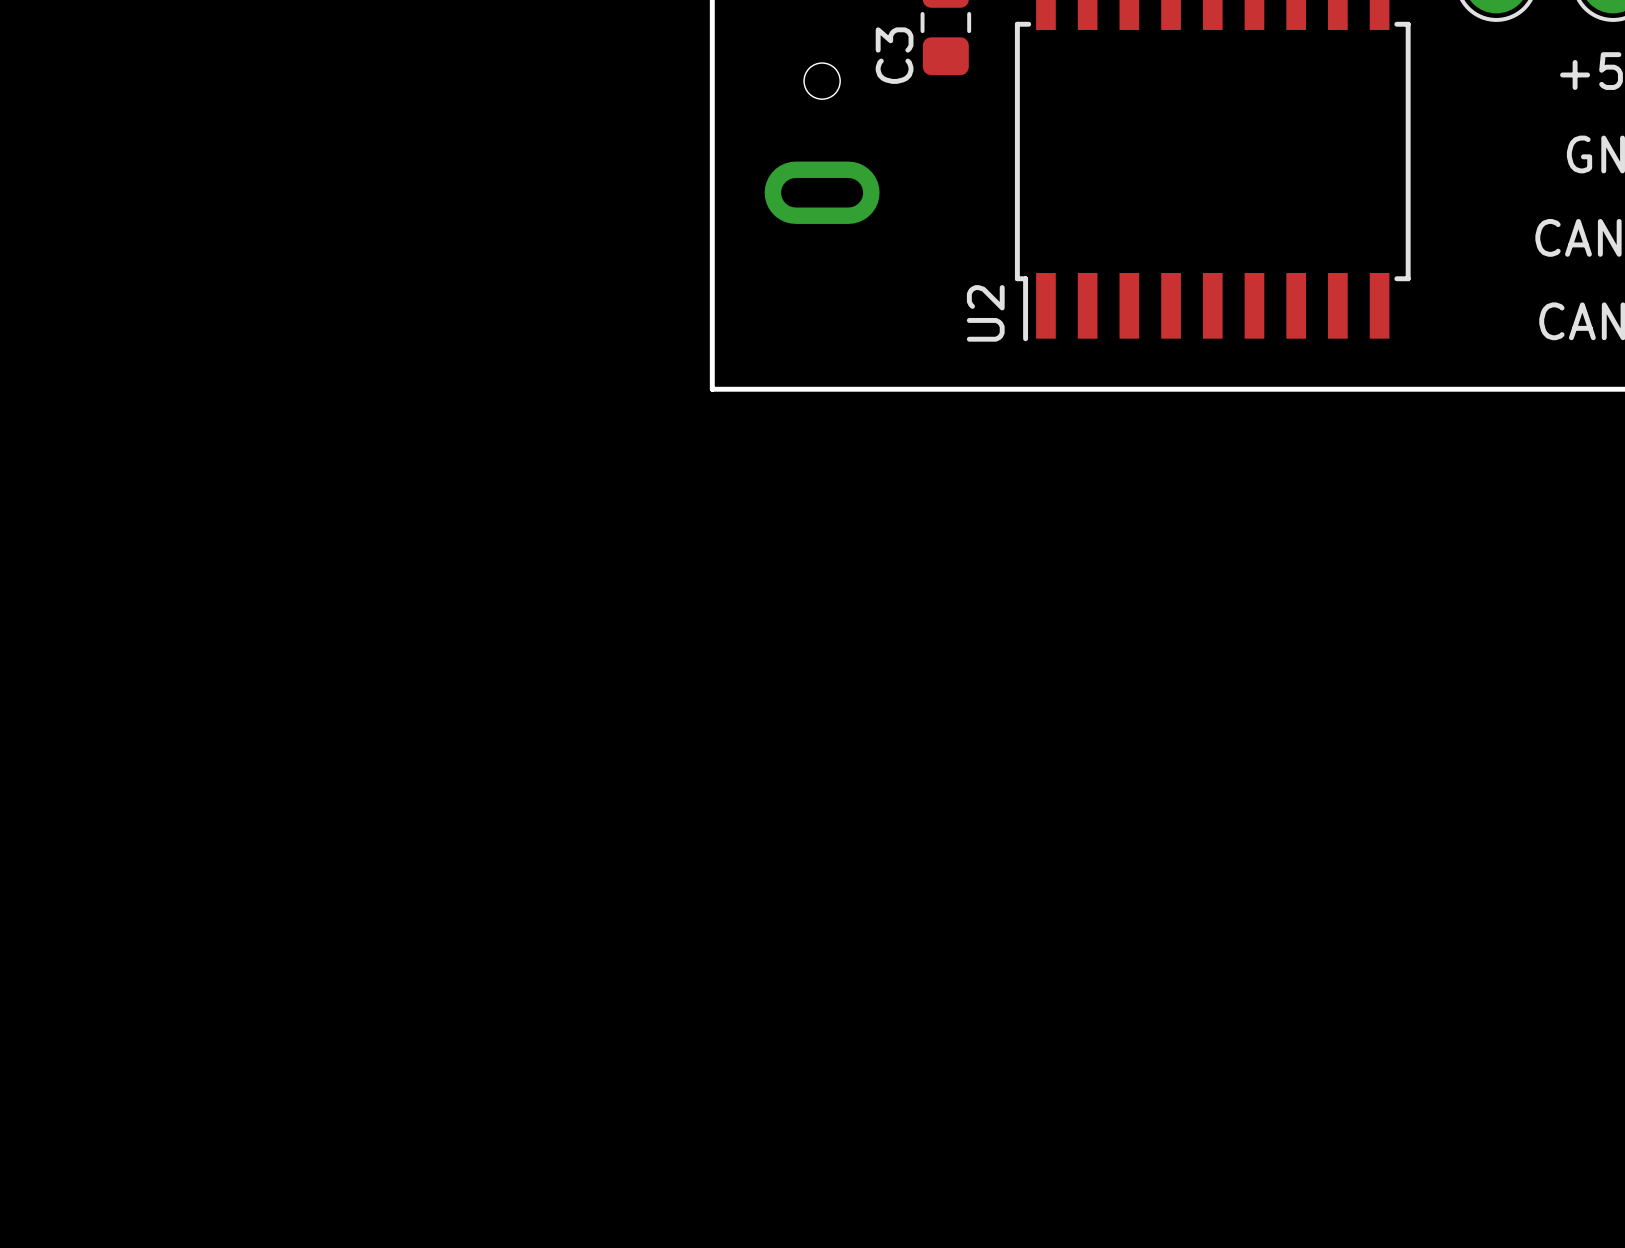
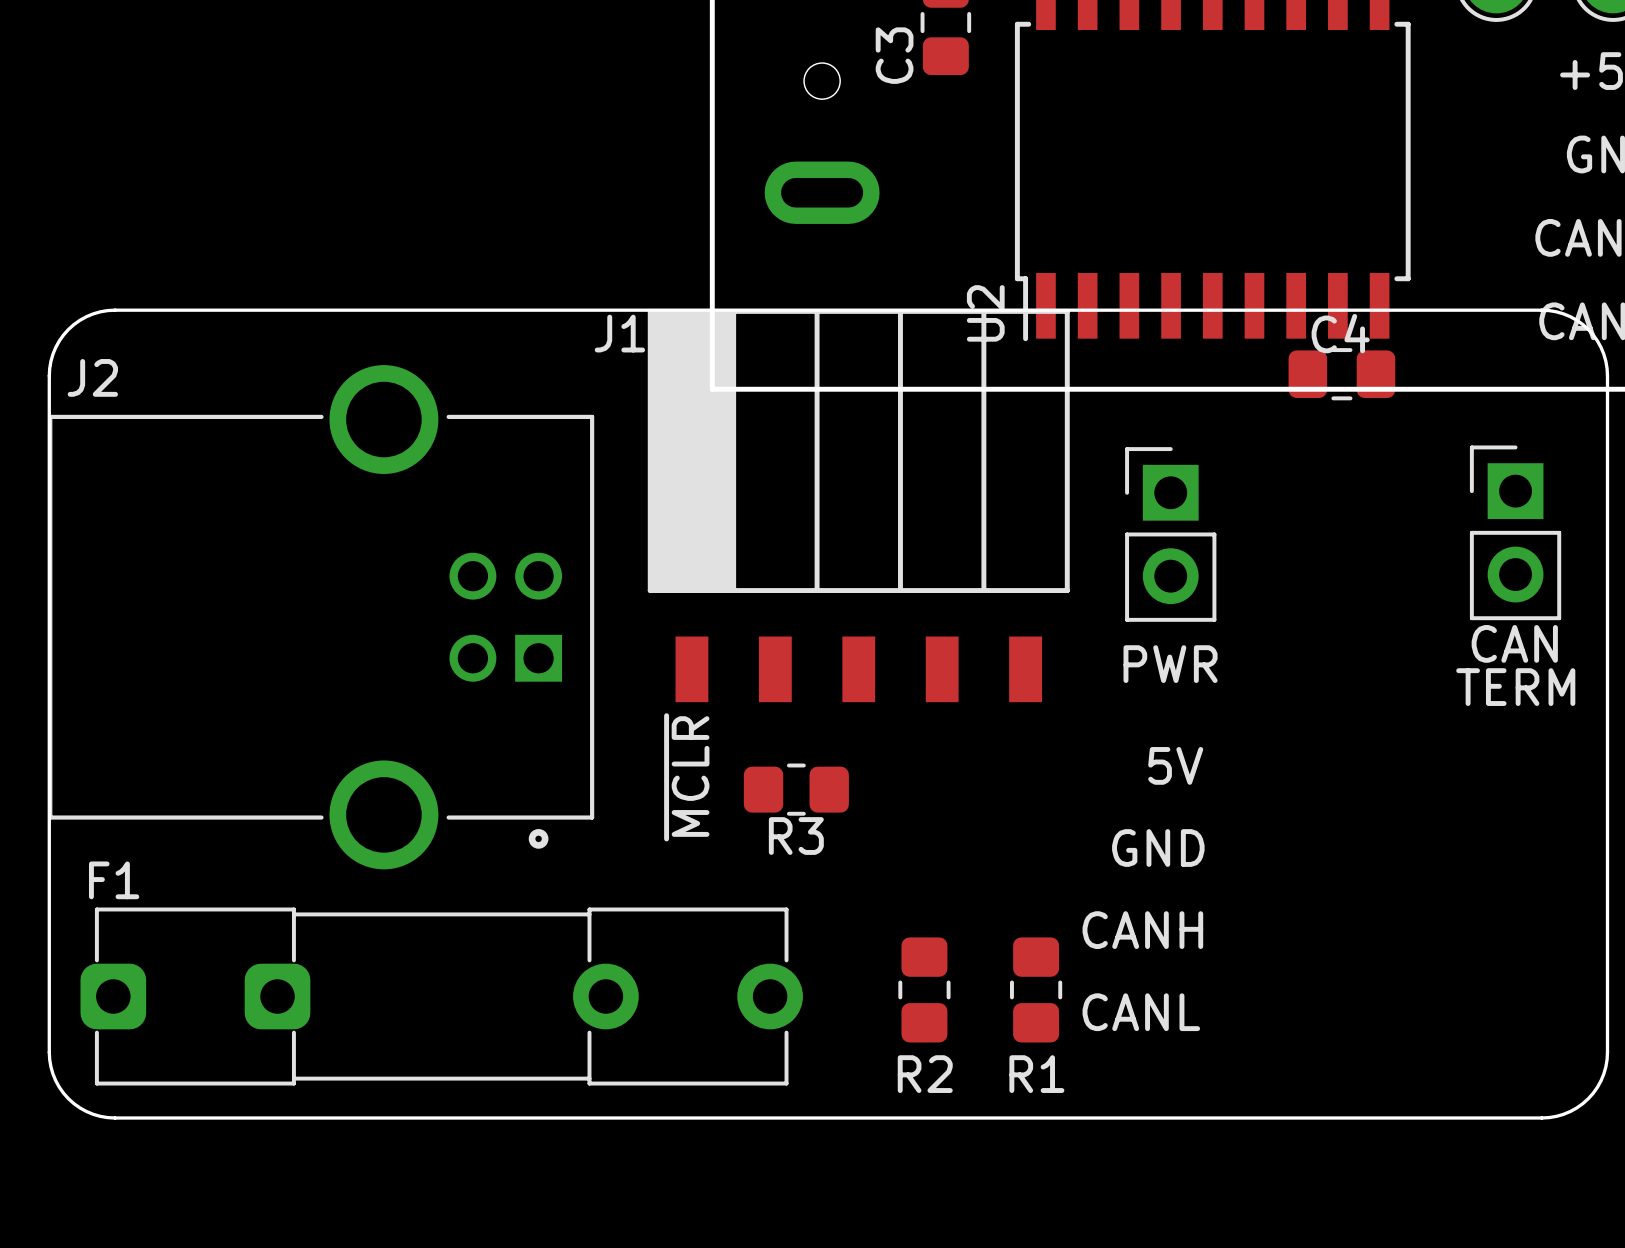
board edge: none -> (114, 310) (1541, 310) (1556, 311) (1570, 316) (1582, 324) (1597, 340) (1603, 354) (1607, 375) (1607, 1052) (1605, 1066) (1600, 1080) (1588, 1098) (1576, 1107) (1556, 1116) (1541, 1118) (114, 1118) (100, 1116) (86, 1111) (68, 1098) (59, 1087) (50, 1066) (49, 1052) (49, 375) (50, 361) (55, 347) (68, 329) (80, 320) (93, 313) (114, 310)
text: none -> C4 (1340, 333)
part: none -> (1341, 374)
J1: none -> (858, 505)
CAN: none -> (1515, 532)
part: none -> (1170, 534)
J2: none -> (321, 617)
text: none -> PWR (1170, 664)
text: none -> TERM (1515, 687)
text: none -> 5V (1175, 765)
text: none -> ~{MCLR} (686, 777)
R3: none -> (796, 789)
text: none -> GND (1158, 848)
text: none -> CANH (1142, 930)
R2: none -> (924, 989)
R1: none -> (1036, 989)
F1: none -> (441, 996)
text: none -> CANL (1141, 1012)

